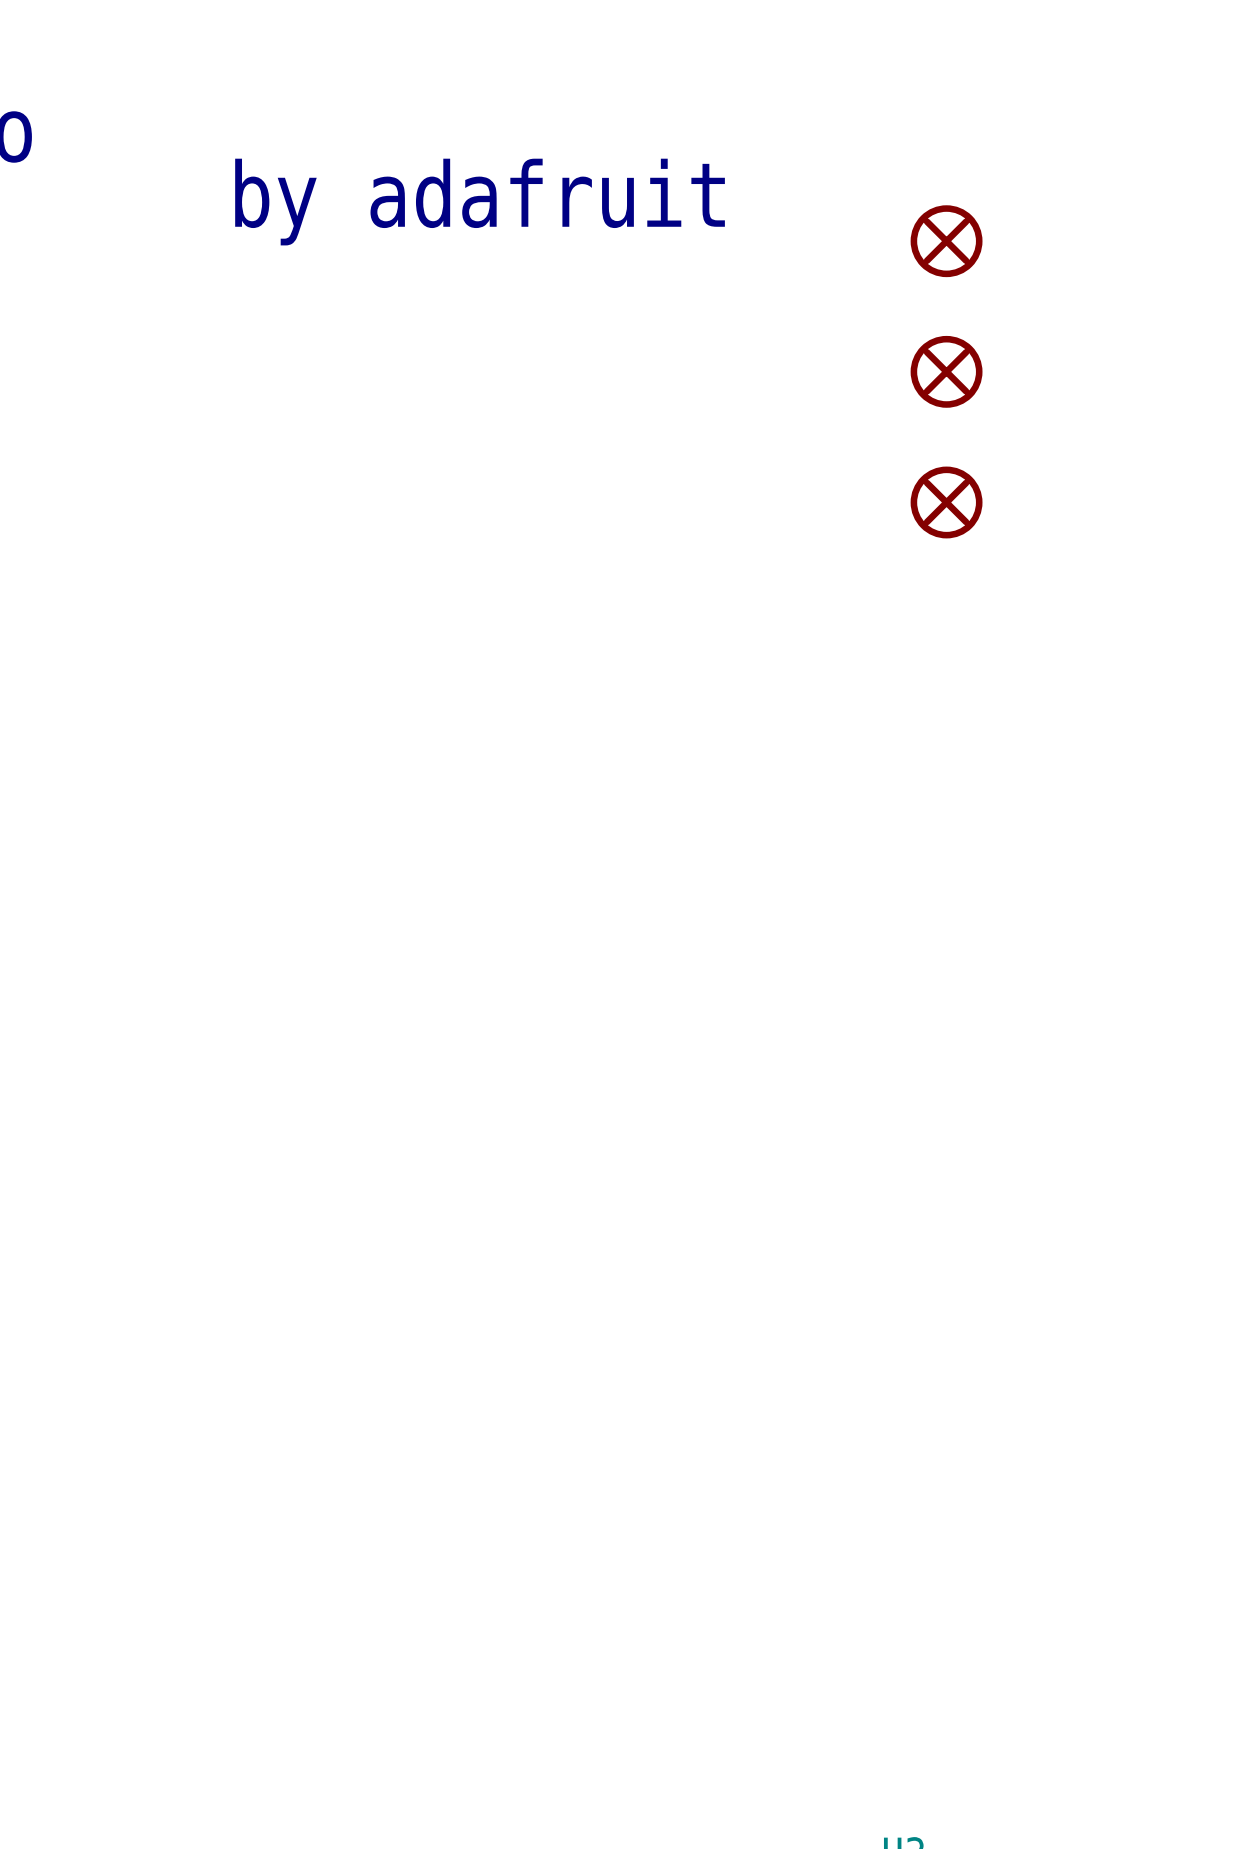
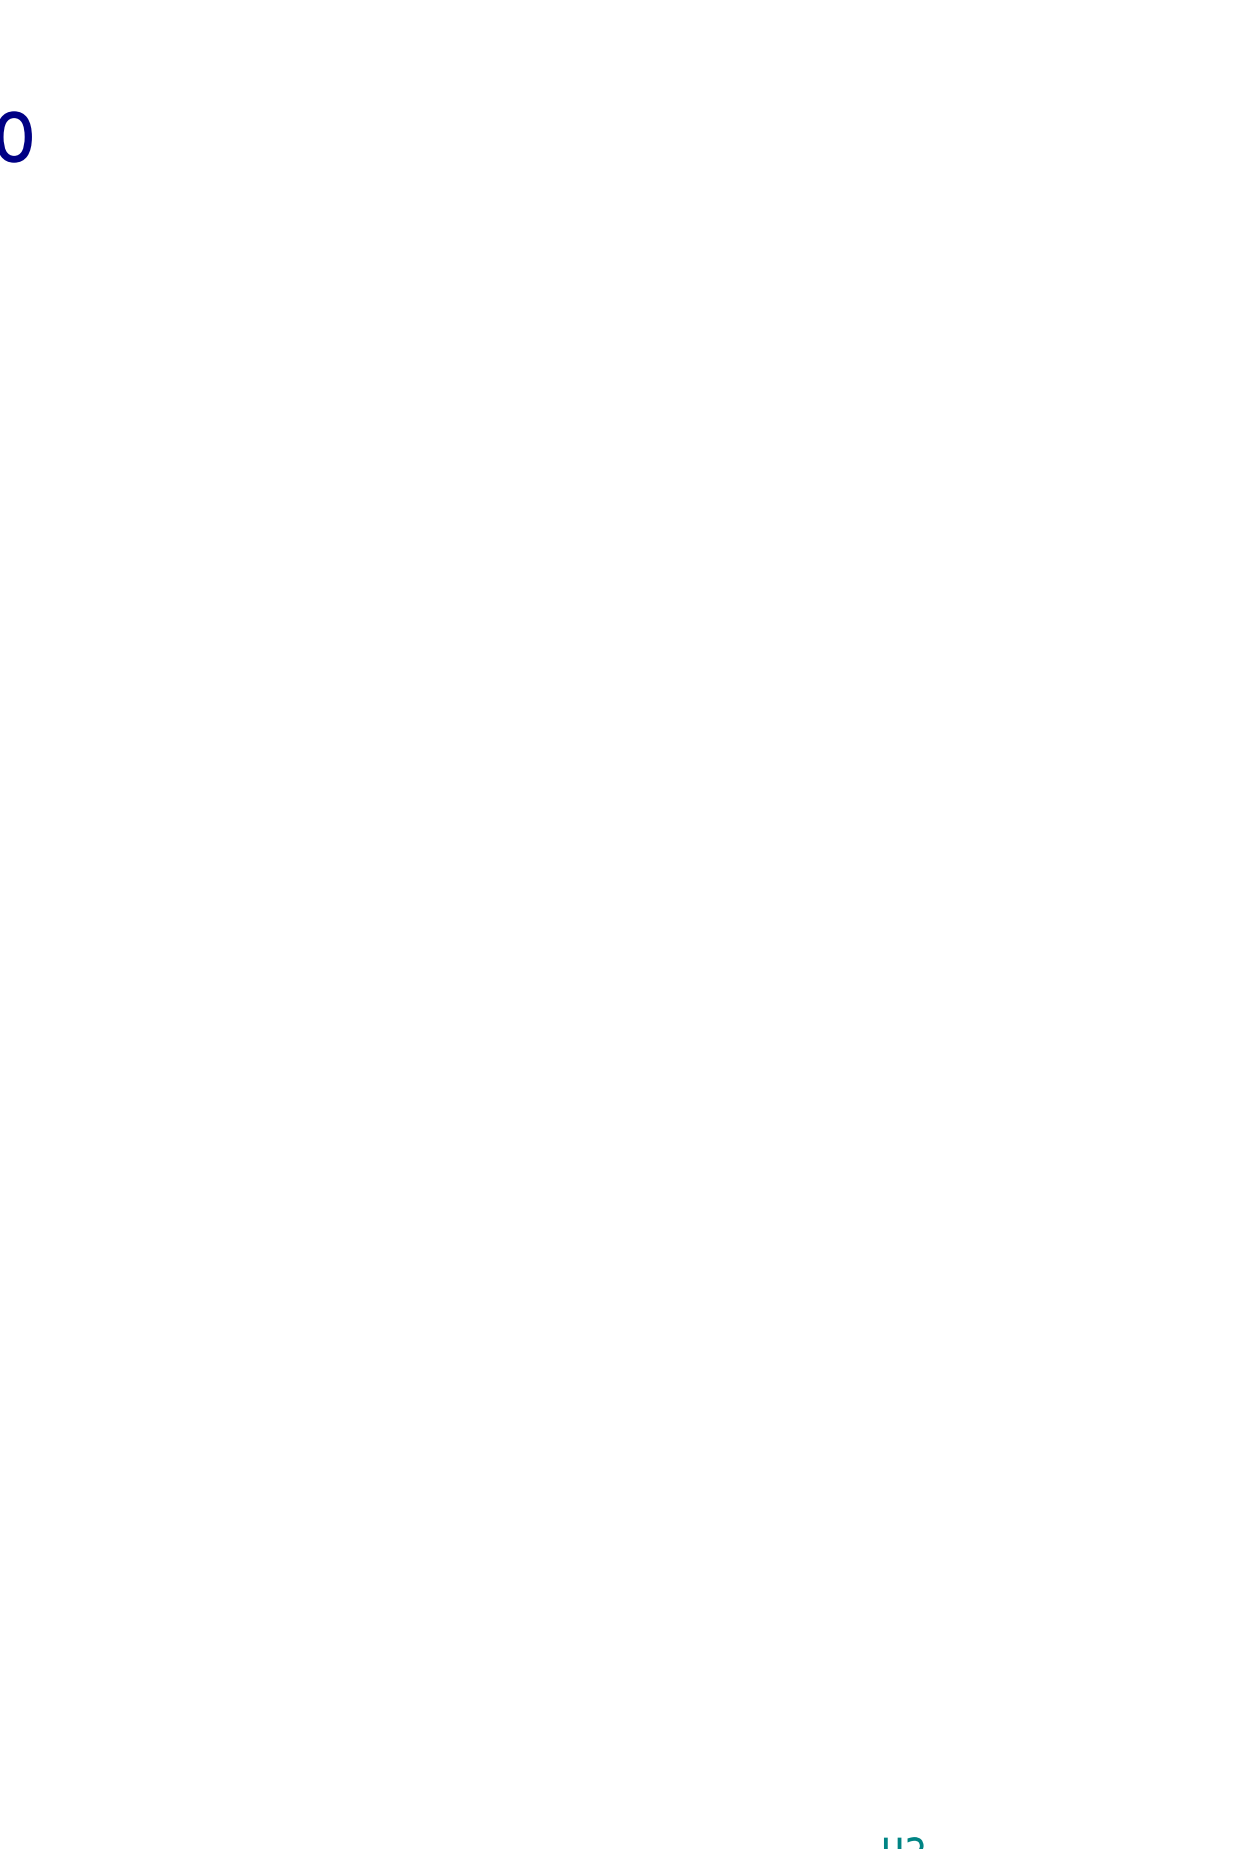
text: by adafruit~{} (480, 202) -> none
part: (946, 241) -> none
part: (946, 371) -> none
part: (946, 502) -> none

